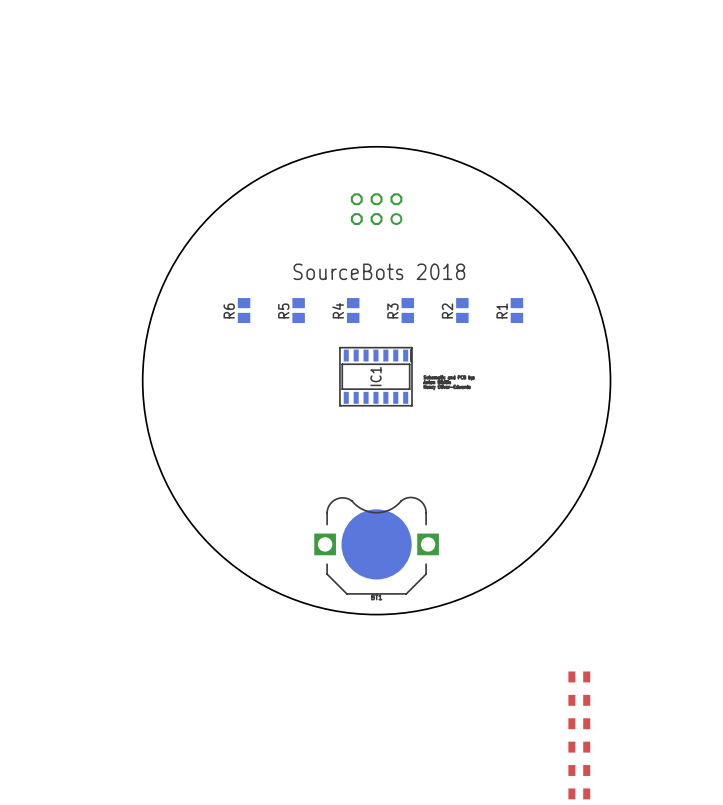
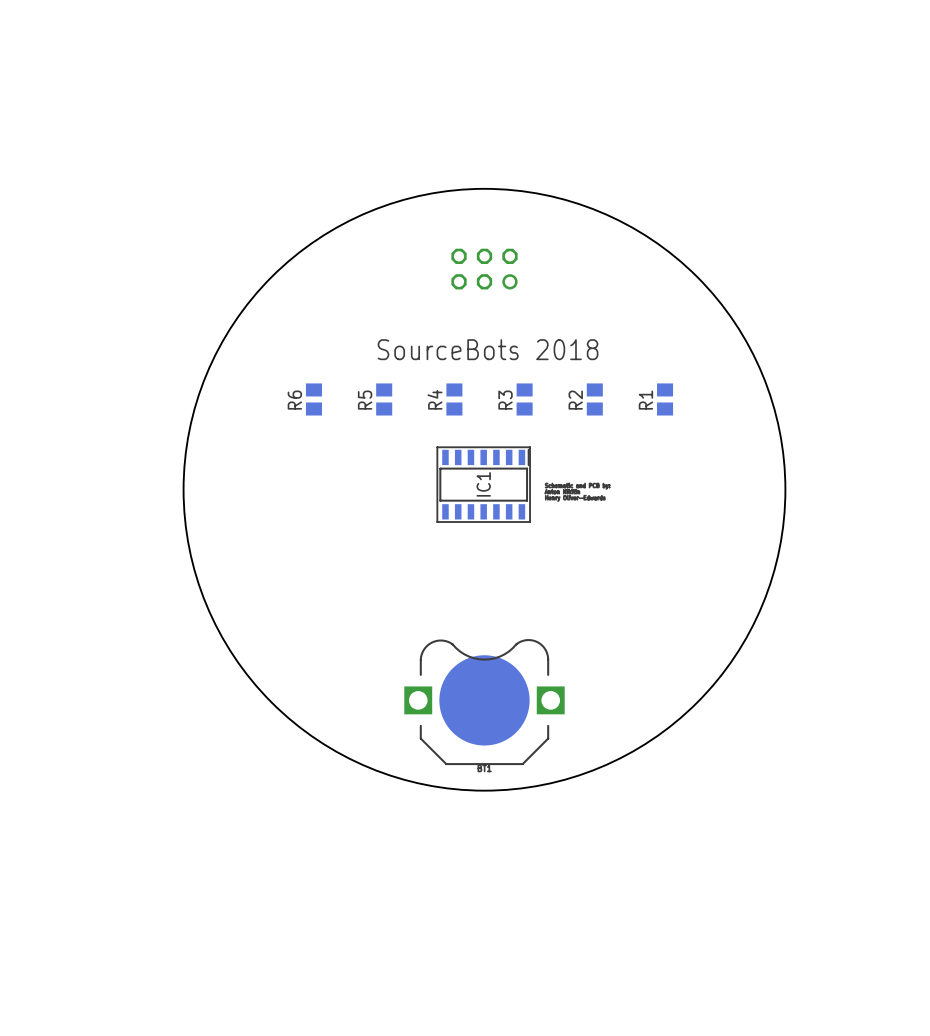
part: (579, 676) -> none
part: (579, 700) -> none
part: (579, 723) -> none
part: (579, 747) -> none
part: (579, 770) -> none
part: (579, 793) -> none

